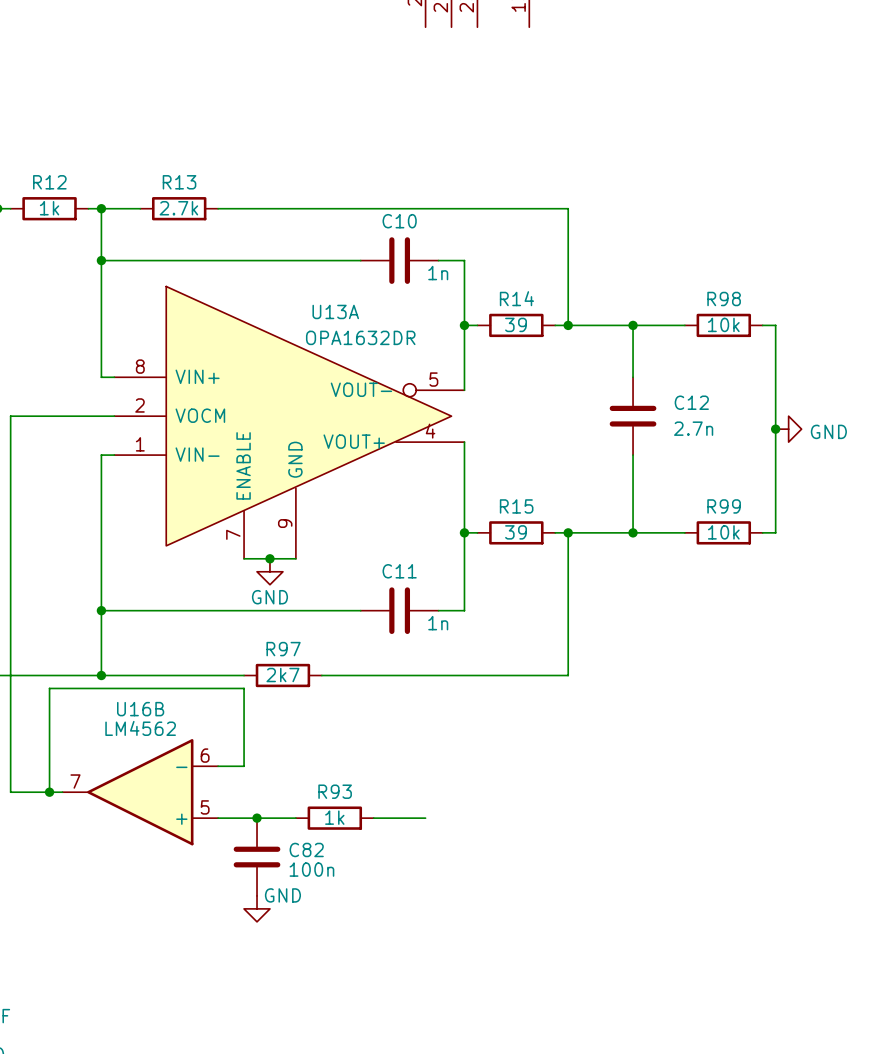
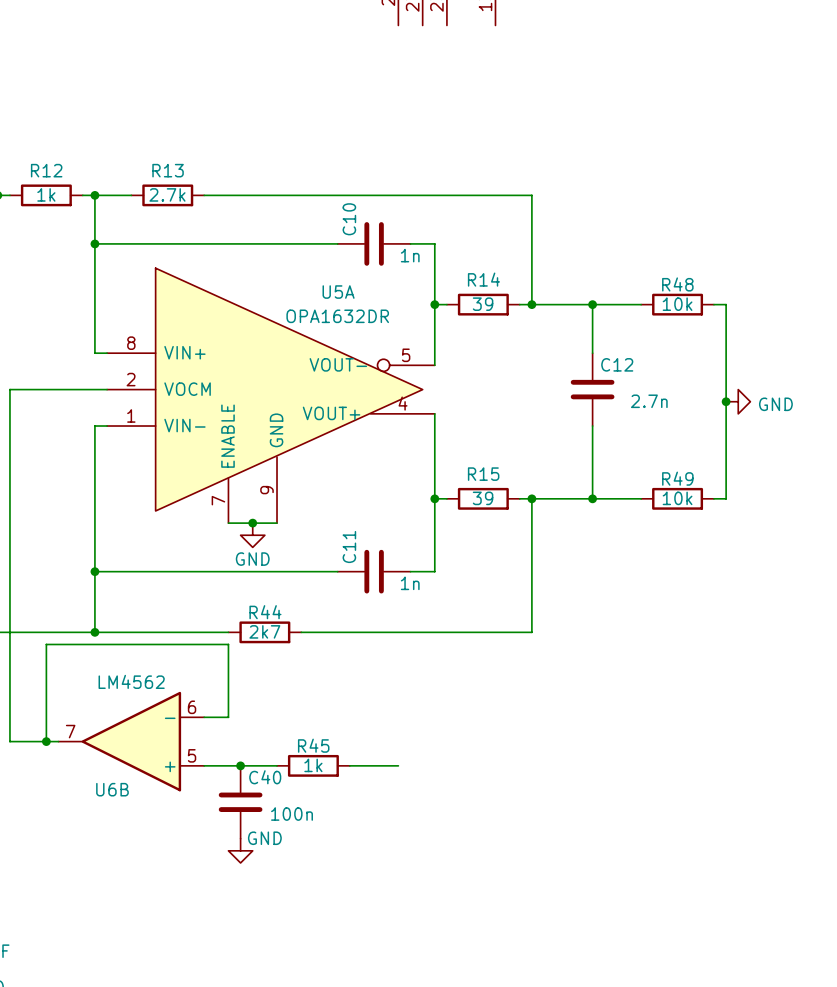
C10 name rotation: 0° (399, 221) -> 90° counterclockwise (349, 219)
R98 name: R98 (724, 298) -> R48 (677, 284)
U13A name: U13A (335, 311) -> U5A (338, 292)
C12 name position: C12 (691, 402) -> C12 (617, 364)
R99 name: R99 (724, 506) -> R49 (677, 478)
C11 name rotation: 0° (399, 571) -> 90° counterclockwise (349, 547)
R97 name: R97 (283, 649) -> R44 (265, 612)
U16B name: U16B (140, 709) -> U6B (112, 789)
R93 name: R93 (335, 791) -> R45 (313, 745)
C82 name: C82 (306, 849) -> C40 (265, 777)

